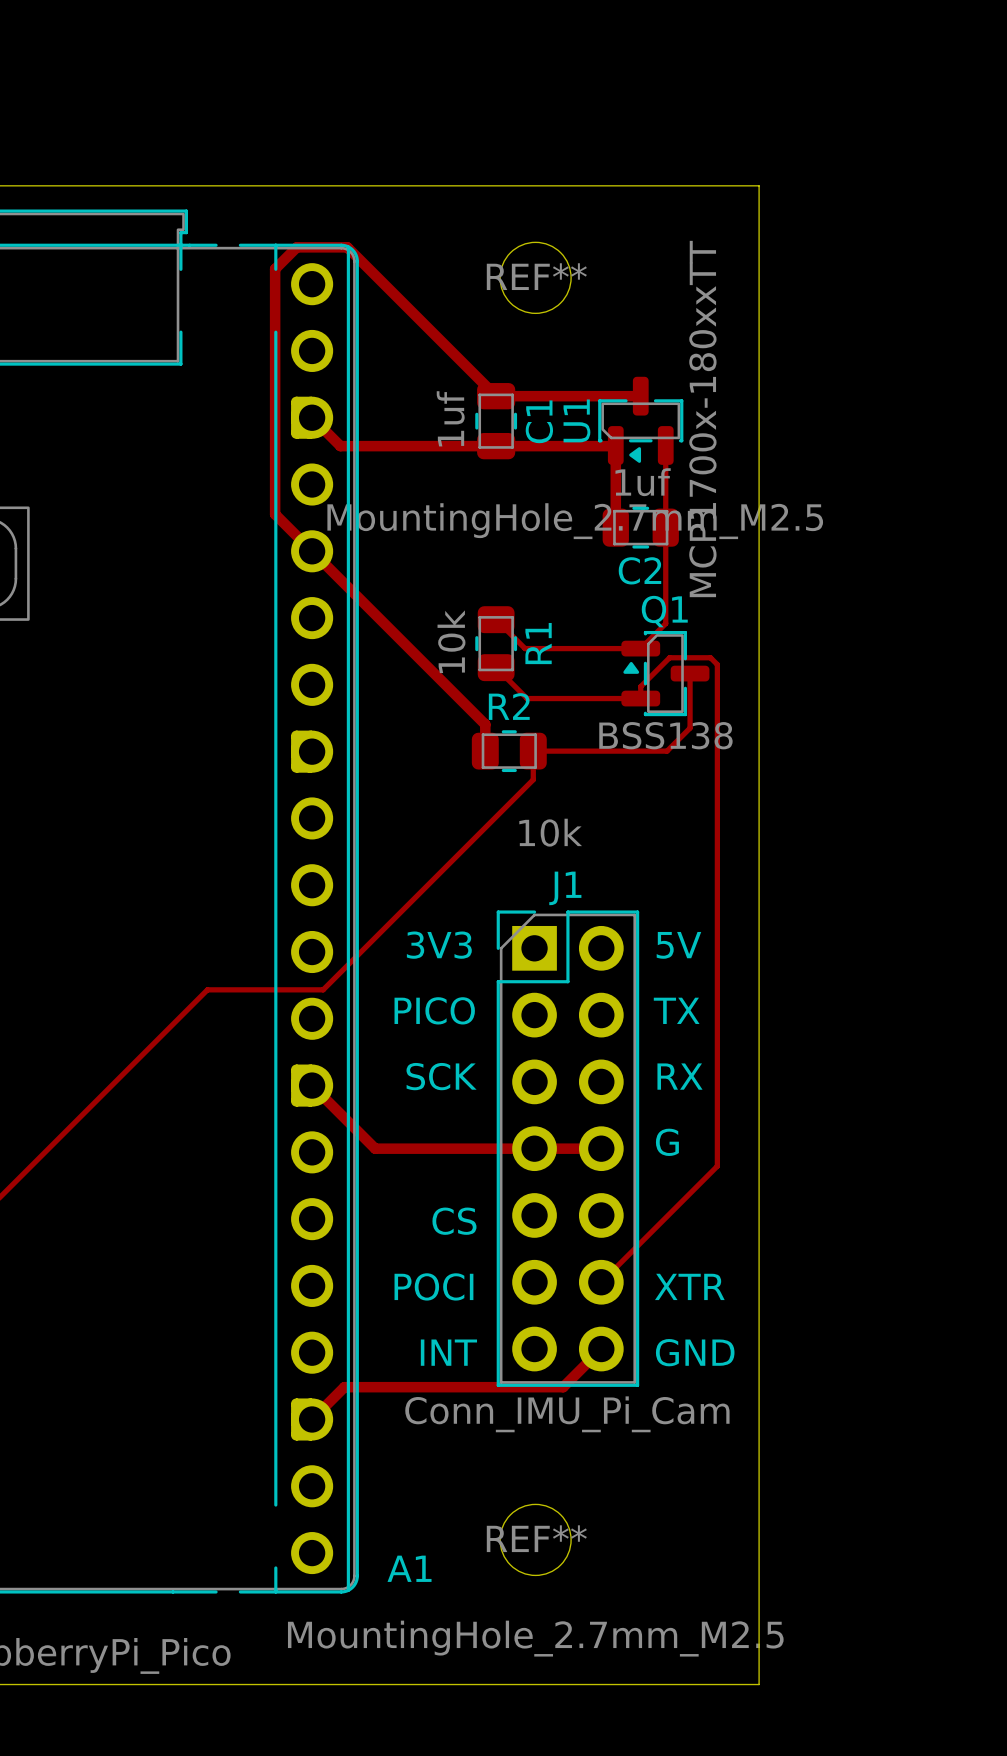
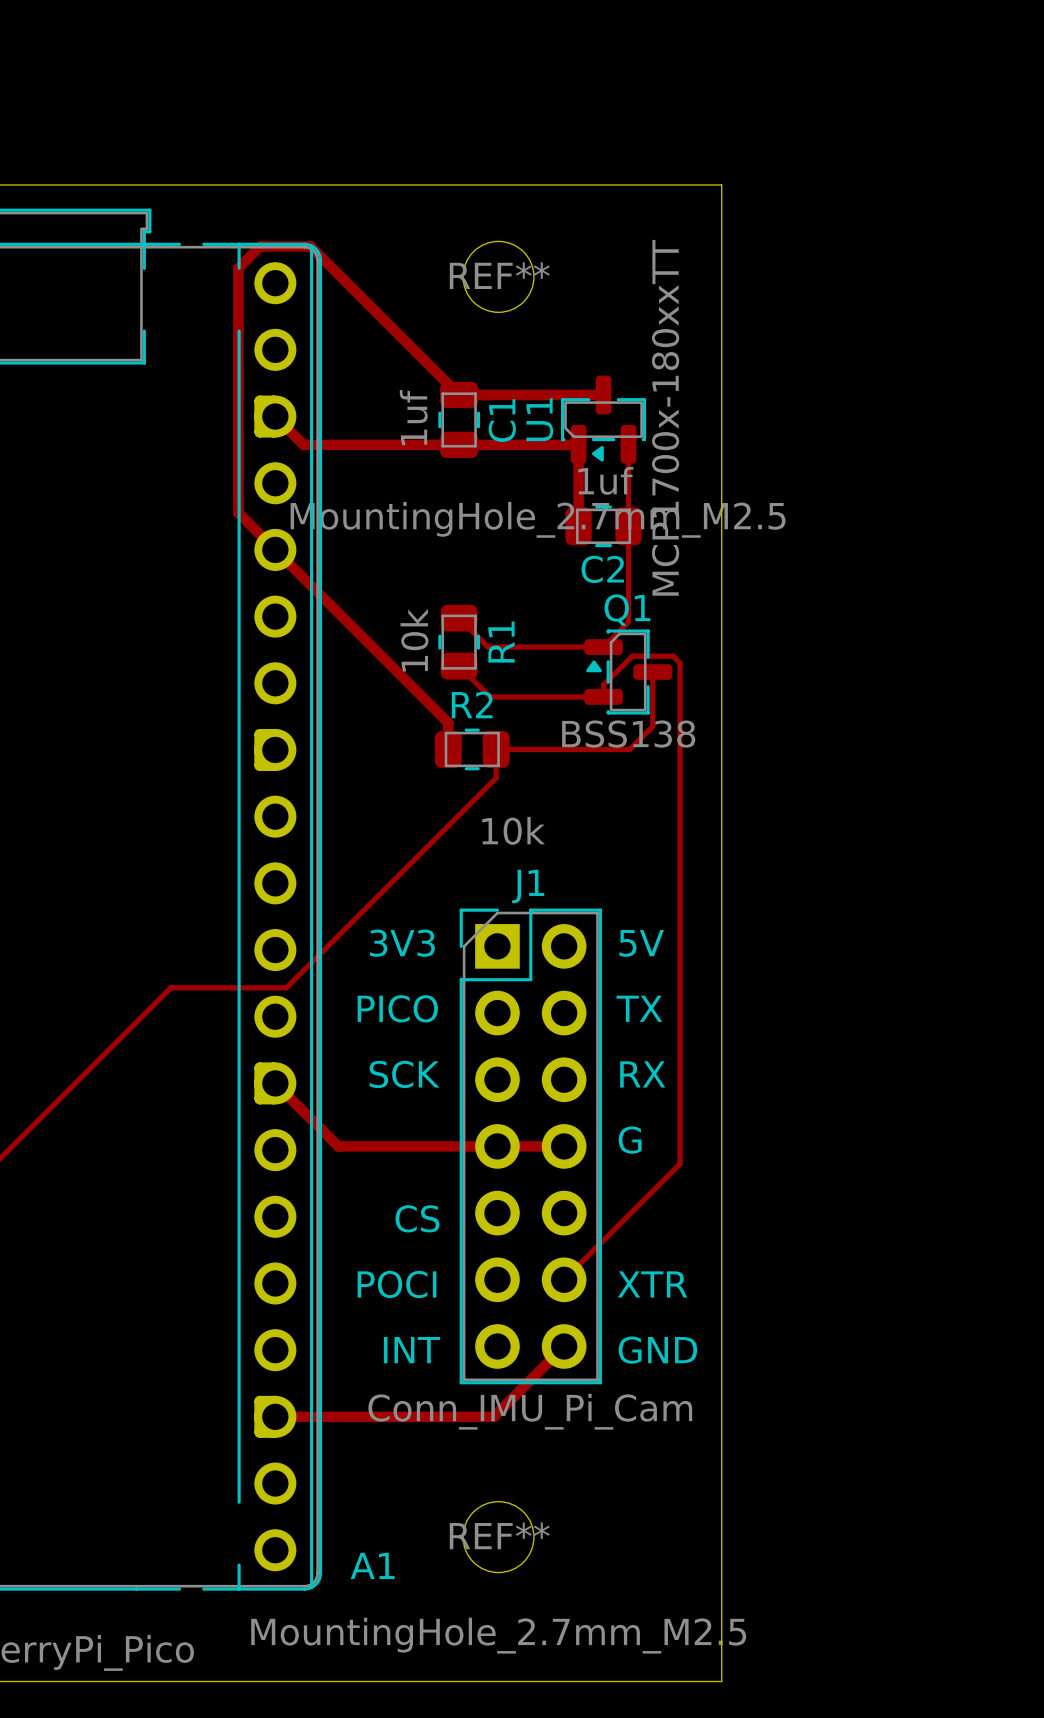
track: (563, 1387) (344, 1387) (312, 1419) -> (526, 1384) (493, 1416) (275, 1416)

